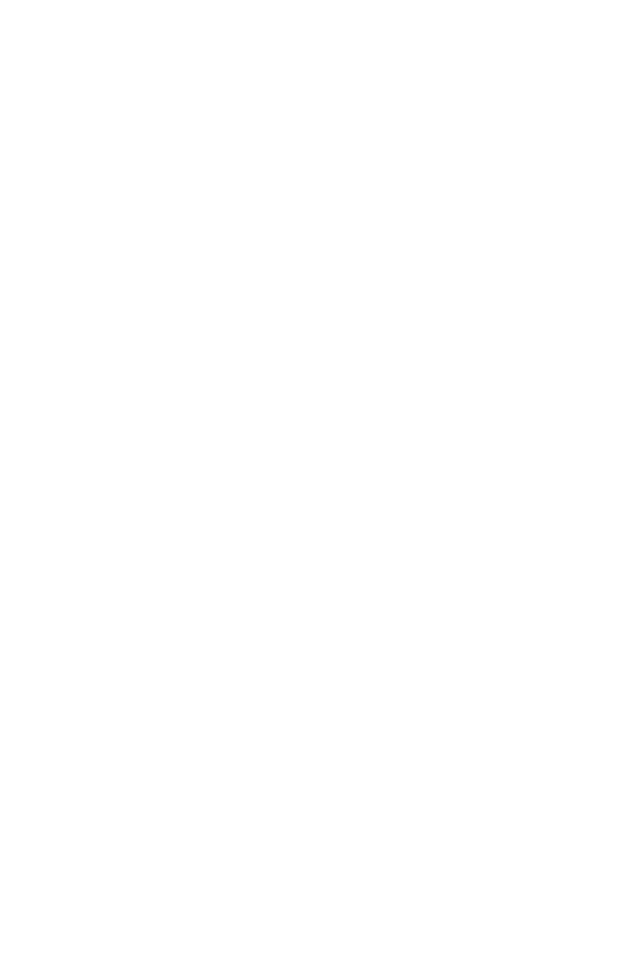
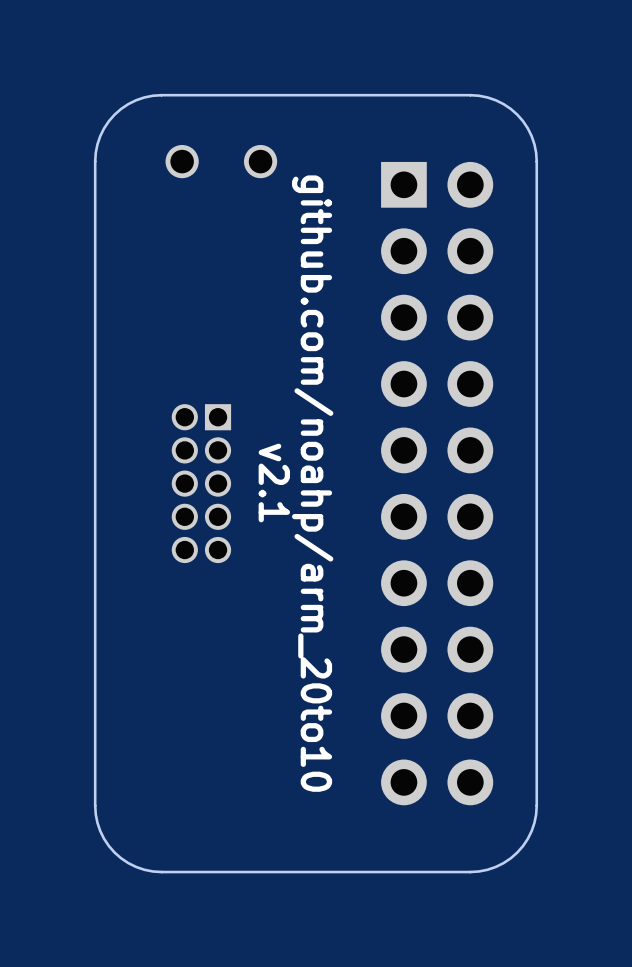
part: none -> (221, 161)
text: none -> v2.1 (274, 482)
part: none -> (201, 483)
text: none -> github.com/noahp/arm_20to10 (312, 483)
part: none -> (437, 483)
board edge: none -> (536, 805) (531, 831) (523, 846) (503, 863) (479, 871) (152, 871) (128, 863) (114, 852) (104, 838) (97, 822) (95, 805) (95, 161) (97, 144) (104, 128) (114, 114) (128, 104) (144, 97) (161, 95) (470, 95) (487, 97) (503, 104) (517, 114) (527, 128) (534, 144) (536, 161) (536, 805)

